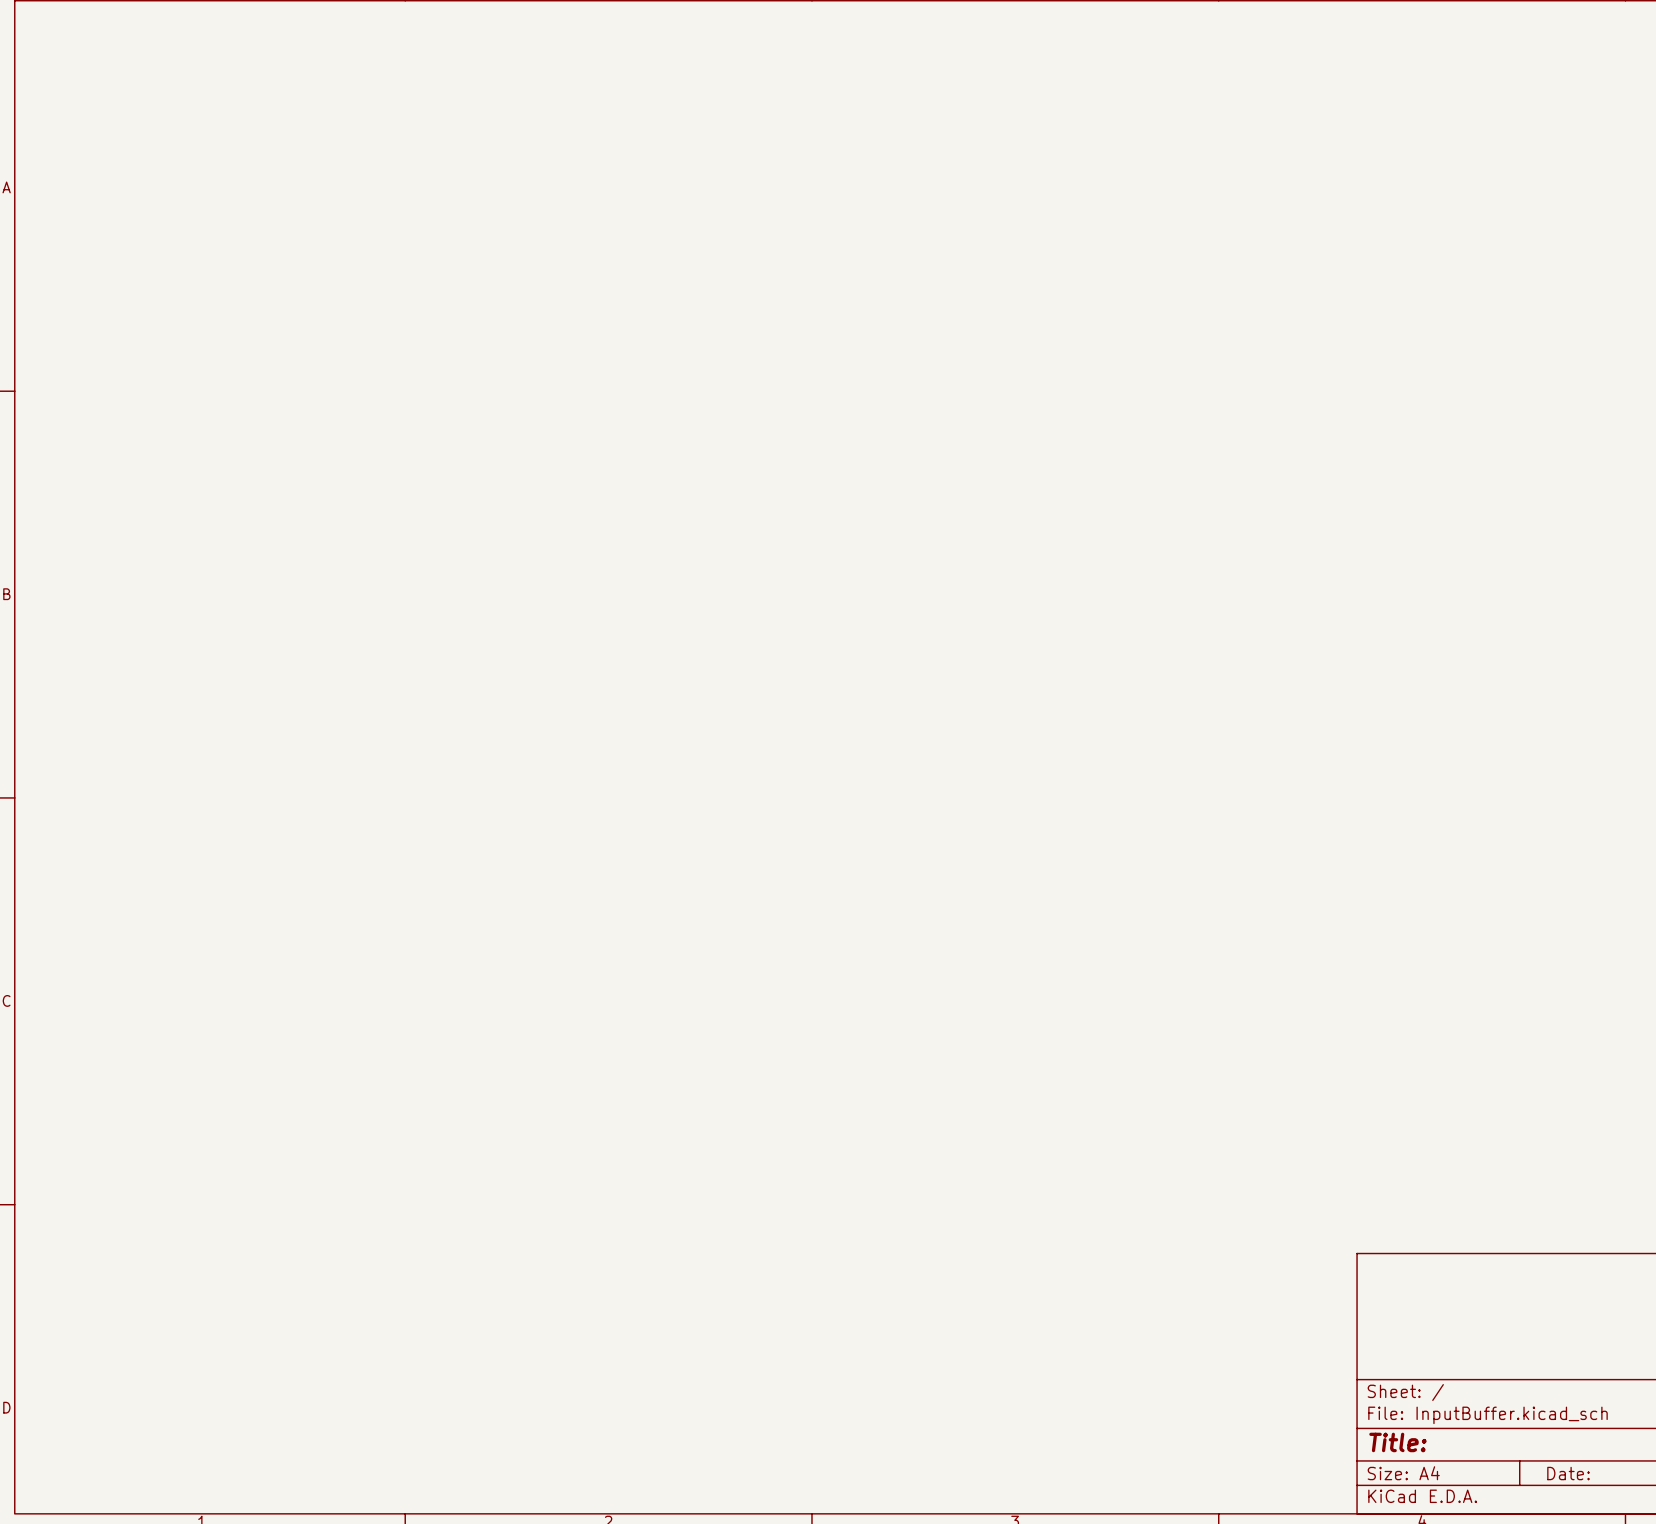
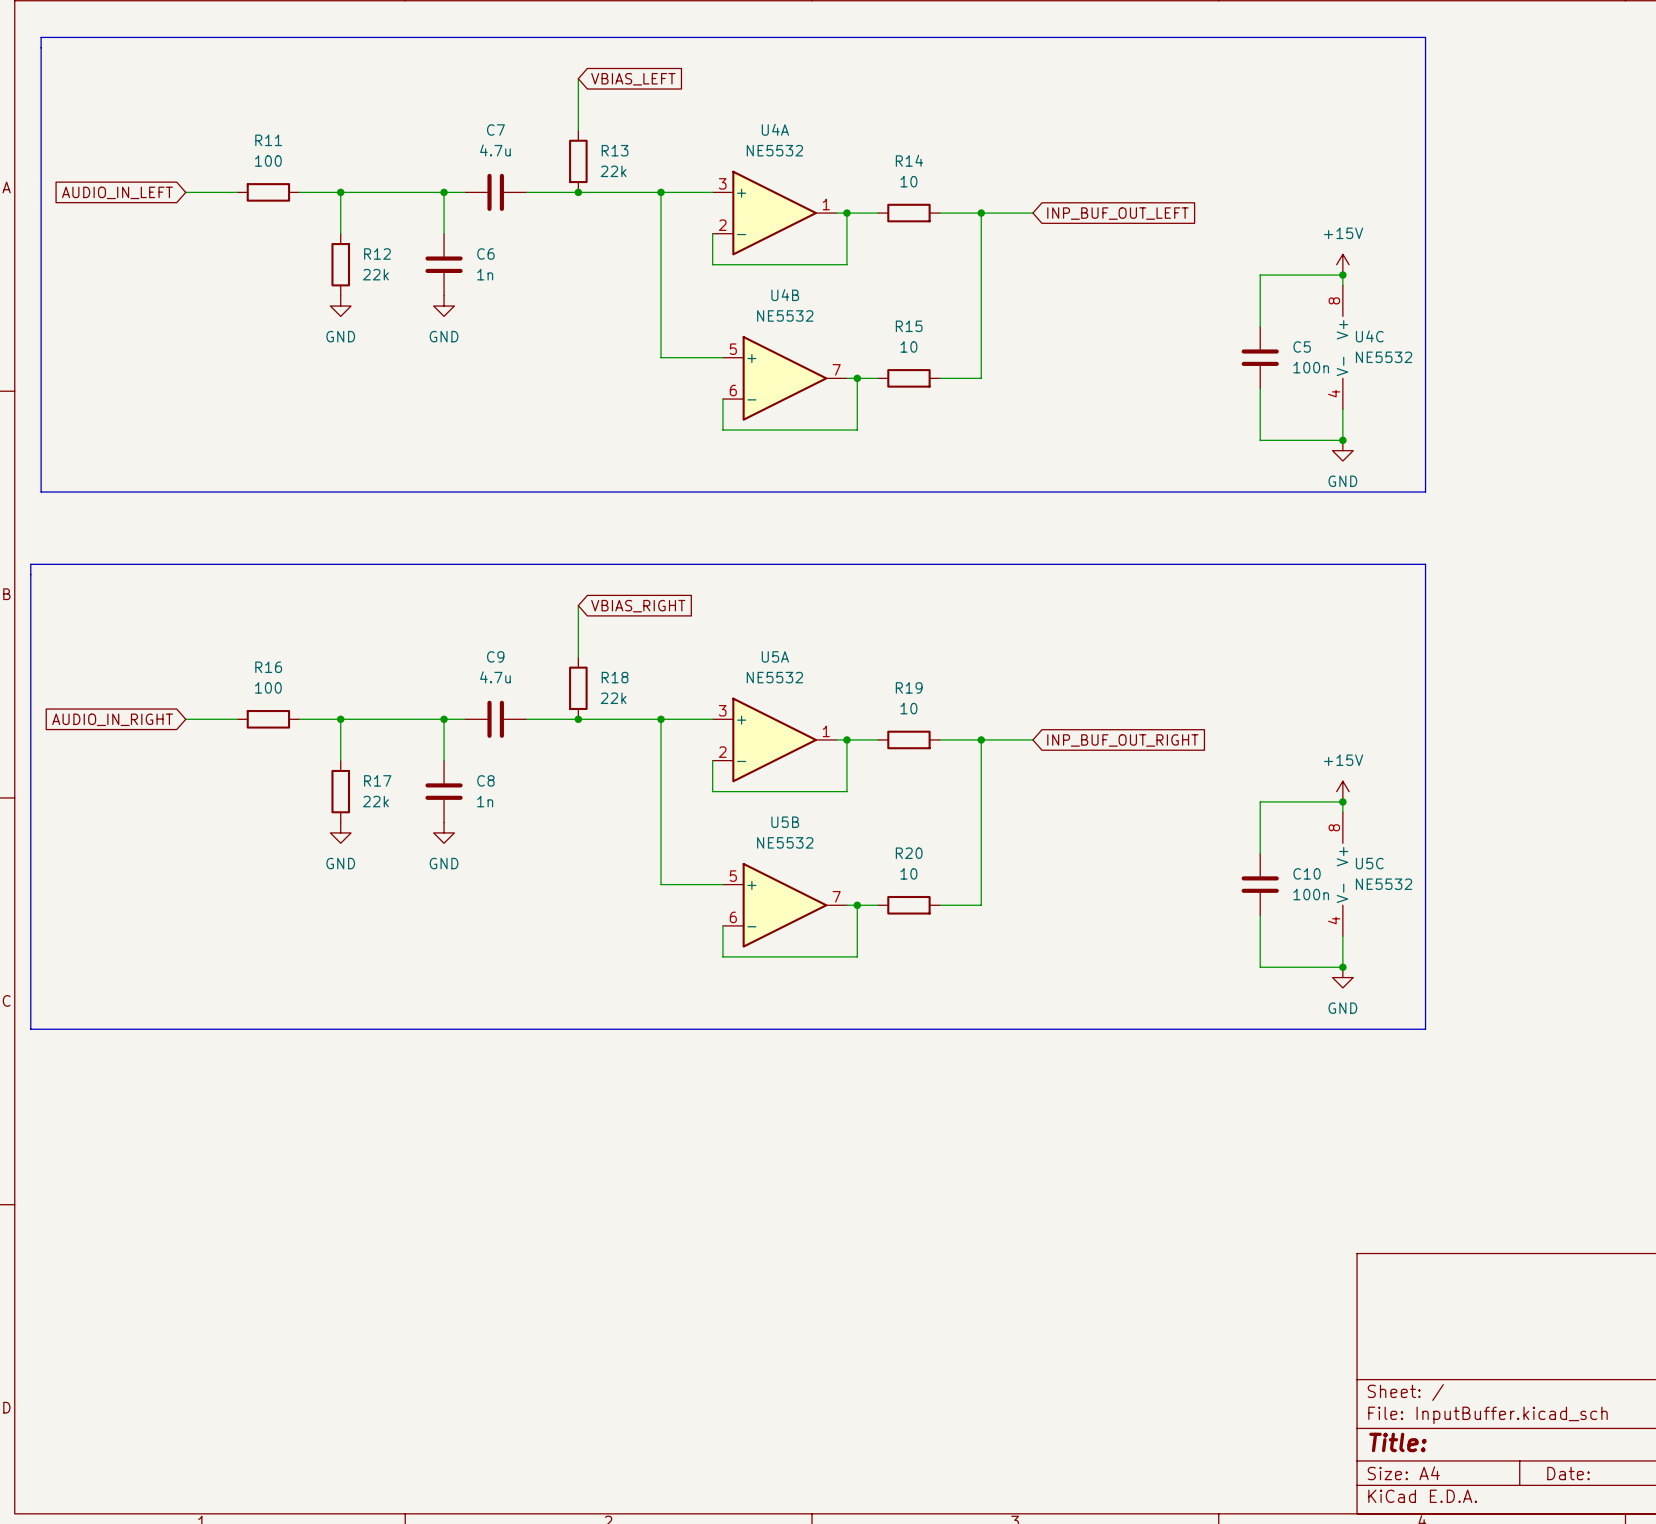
line: none -> (41, 37) (41, 492) (1425, 492) (1425, 37) (41, 37)
wire: none -> (578, 78) (578, 130)
global label: none -> VBIAS_LEFT (633, 79)
R13: none -> 22k (578, 161)
global label: none -> AUDIO_IN_LEFT (117, 192)
wire: none -> (185, 192) (237, 192)
R11: none -> 100 (268, 192)
wire: none -> (299, 192) (464, 192)
wire: none -> (340, 192) (340, 233)
junction: none -> (340, 192)
wire: none -> (444, 192) (444, 233)
junction: none -> (444, 192)
C7: none -> 4.7u (495, 192)
wire: none -> (526, 192) (712, 192)
junction: none -> (578, 192)
wire: none -> (661, 192) (661, 357) (722, 357)
junction: none -> (661, 192)
U4A: none -> NE5532 (774, 213)
wire: none -> (836, 213) (877, 213)
wire: none -> (846, 213) (846, 264) (712, 264) (712, 233)
junction: none -> (846, 213)
R14: none -> 10 (908, 213)
wire: none -> (939, 213) (1032, 213)
wire: none -> (981, 213) (981, 378) (939, 378)
junction: none -> (981, 213)
global label: none -> INP_BUF_OUT_LEFT (1117, 213)
R12: none -> 22k (340, 264)
C6: none -> 1n (444, 264)
power symbol: none -> +15V (1342, 264)
junction: none -> (1342, 275)
wire: none -> (1342, 285) (1342, 275) (1260, 275) (1260, 326)
power symbol: none -> GND (340, 306)
power symbol: none -> GND (444, 306)
U4C: none -> NE5532 (1342, 347)
C5: none -> 100n (1260, 357)
U4B: none -> NE5532 (784, 378)
wire: none -> (846, 378) (877, 378)
wire: none -> (857, 378) (857, 430) (722, 430) (722, 399)
junction: none -> (857, 378)
R15: none -> 10 (908, 378)
wire: none -> (1260, 388) (1260, 440) (1342, 440) (1342, 409)
junction: none -> (1342, 440)
power symbol: none -> GND (1342, 450)
line: none -> (30, 564) (30, 1029) (1425, 1029) (1425, 564) (30, 564)
wire: none -> (578, 605) (578, 657)
global label: none -> VBIAS_RIGHT (638, 606)
R18: none -> 22k (578, 688)
global label: none -> AUDIO_IN_RIGHT (112, 719)
wire: none -> (185, 719) (237, 719)
R16: none -> 100 (268, 719)
wire: none -> (299, 719) (464, 719)
wire: none -> (340, 719) (340, 760)
junction: none -> (340, 719)
wire: none -> (444, 719) (444, 760)
junction: none -> (444, 719)
C9: none -> 4.7u (495, 719)
wire: none -> (526, 719) (712, 719)
junction: none -> (578, 719)
wire: none -> (661, 719) (661, 884) (722, 884)
junction: none -> (661, 719)
U5A: none -> NE5532 (774, 739)
wire: none -> (836, 739) (877, 739)
wire: none -> (846, 739) (846, 791) (712, 791) (712, 760)
junction: none -> (846, 739)
R19: none -> 10 (908, 739)
wire: none -> (939, 739) (1032, 739)
wire: none -> (981, 739) (981, 905) (939, 905)
junction: none -> (981, 739)
global label: none -> INP_BUF_OUT_RIGHT (1122, 740)
R17: none -> 22k (340, 791)
C8: none -> 1n (444, 791)
power symbol: none -> +15V (1342, 791)
junction: none -> (1342, 801)
wire: none -> (1342, 812) (1342, 801) (1260, 801) (1260, 853)
power symbol: none -> GND (340, 832)
power symbol: none -> GND (444, 832)
U5C: none -> NE5532 (1342, 874)
C10: none -> 100n (1260, 884)
U5B: none -> NE5532 (784, 905)
wire: none -> (846, 905) (877, 905)
wire: none -> (857, 905) (857, 956) (722, 956) (722, 925)
junction: none -> (857, 905)
R20: none -> 10 (908, 905)
wire: none -> (1260, 915) (1260, 967) (1342, 967) (1342, 936)
junction: none -> (1342, 967)
power symbol: none -> GND (1342, 977)

